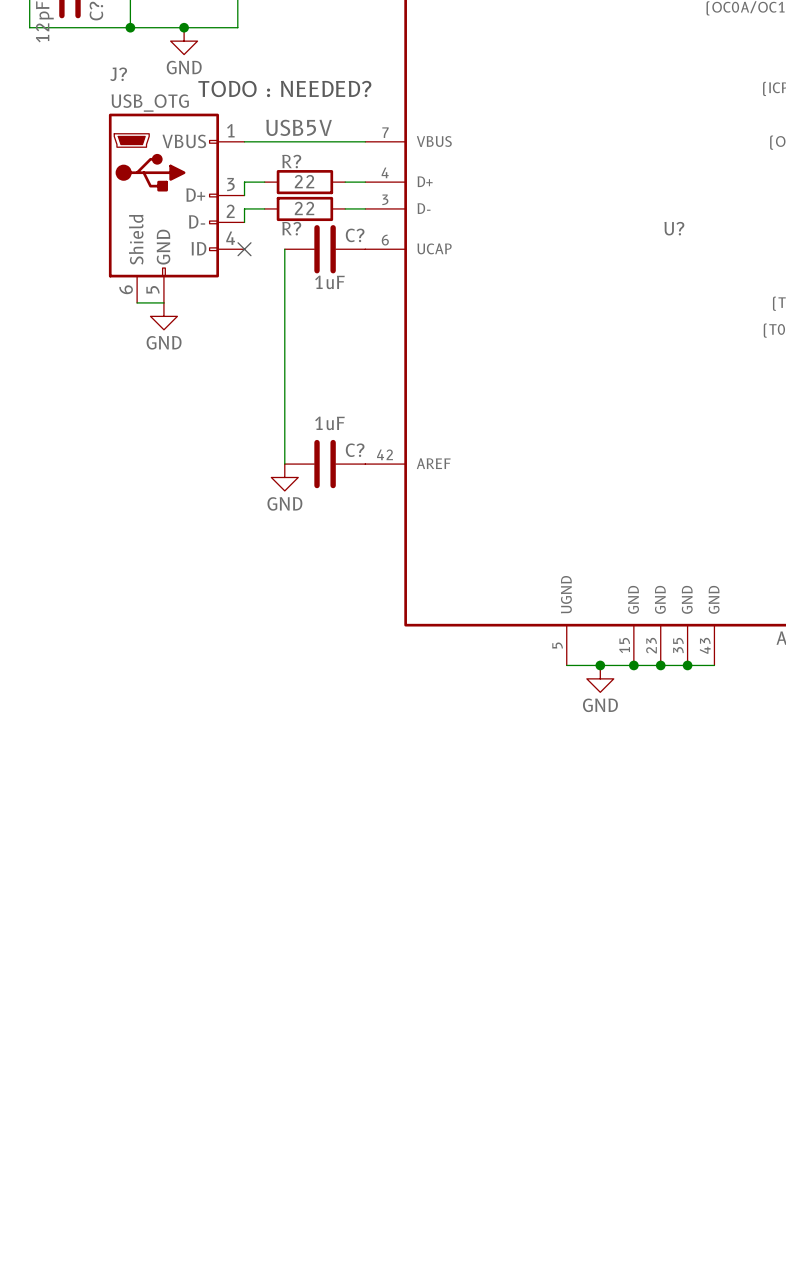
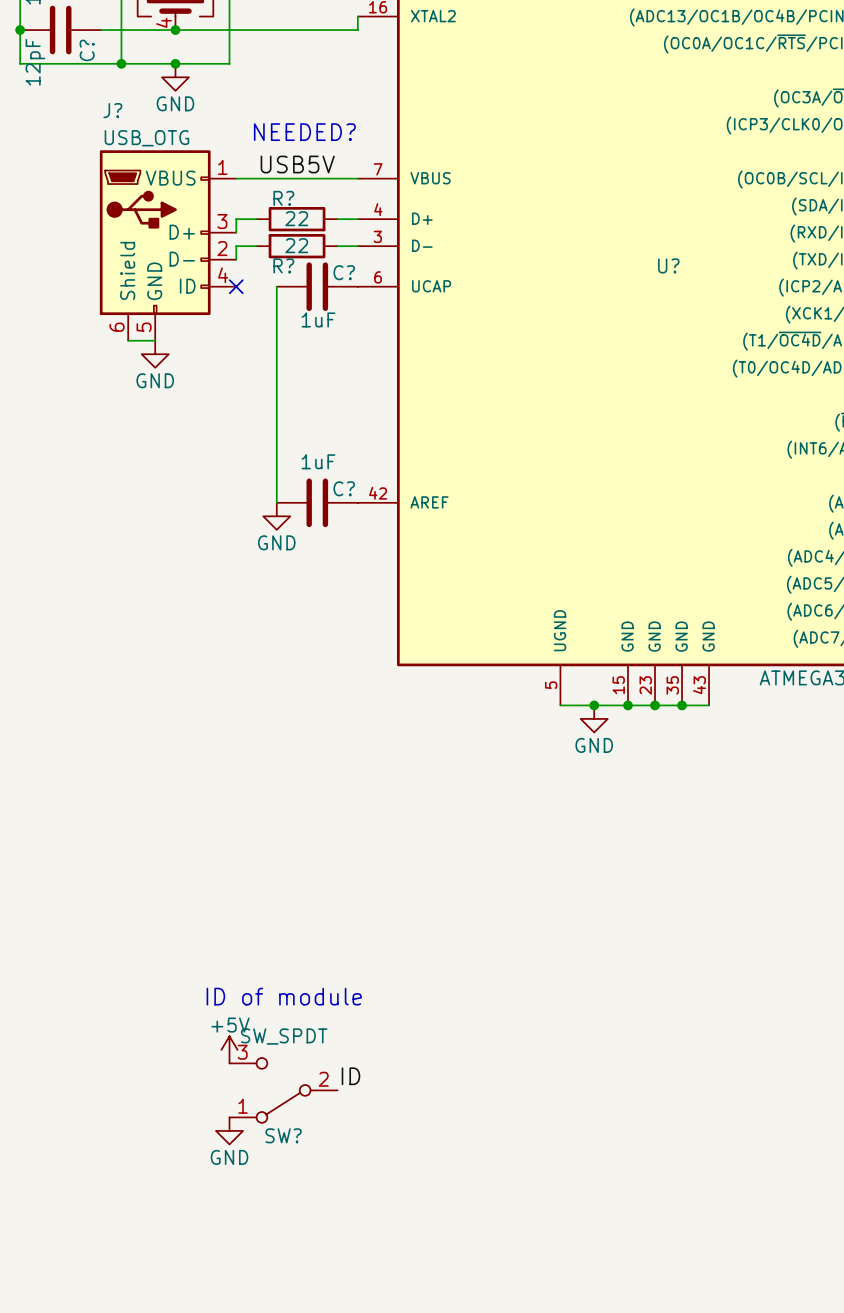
text: TODO : NEEDED? (284, 88) -> NEEDED? (304, 132)
text: none -> ID of module (284, 996)
power symbol: none -> +5V (229, 1049)
label: none -> ID (350, 1076)
SW?: none -> SW_SPDT (283, 1090)
power symbol: none -> GND (229, 1130)

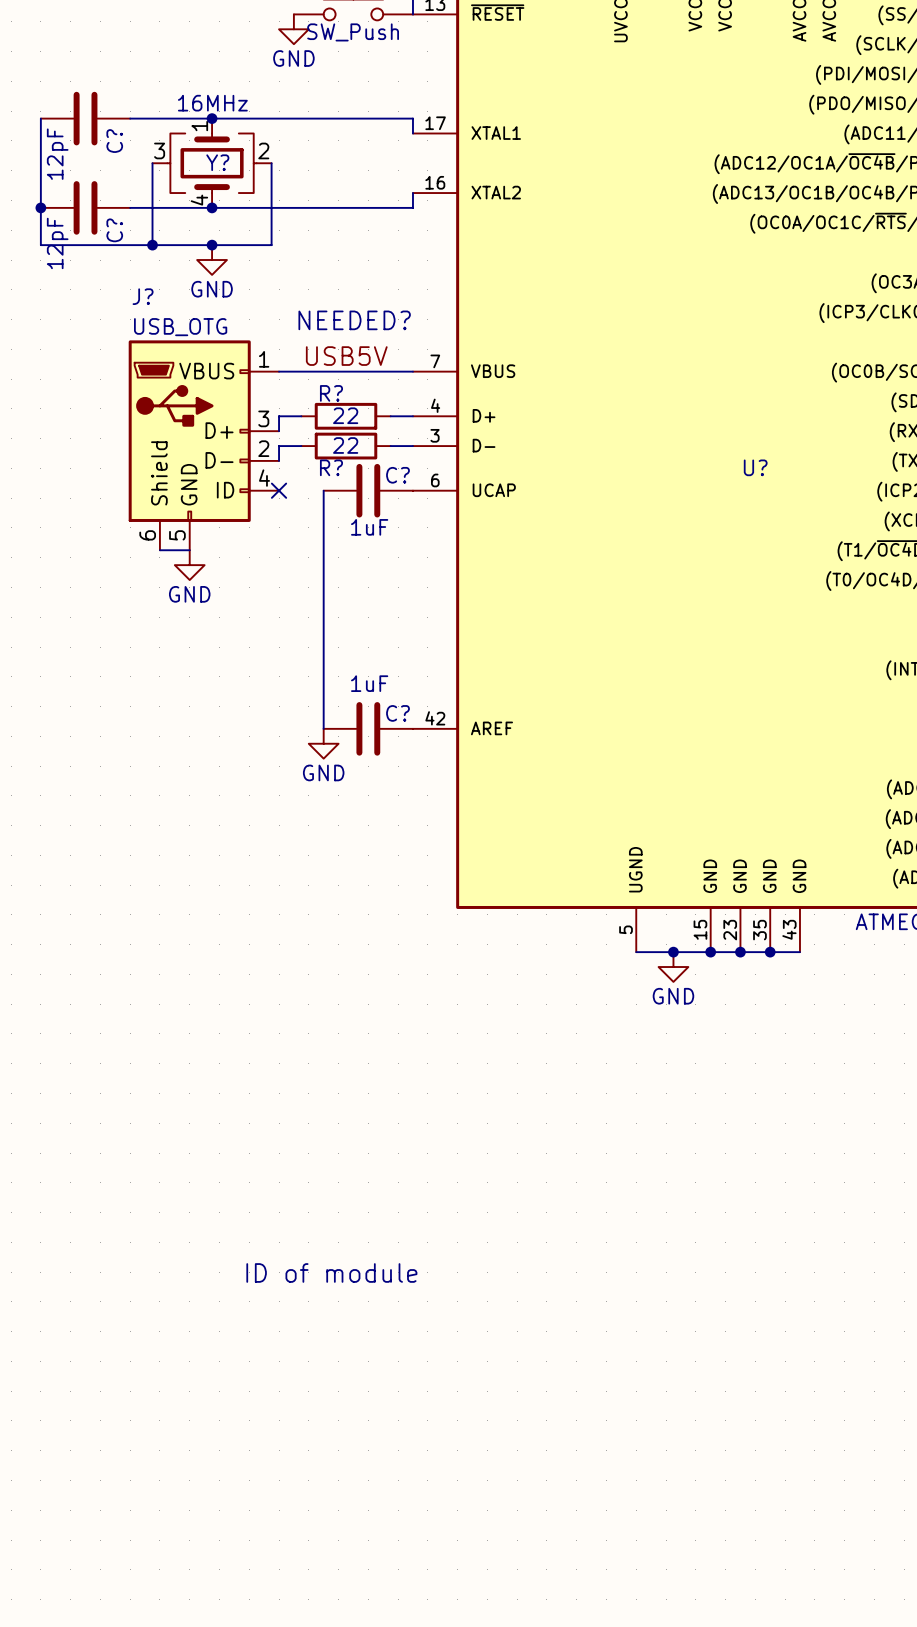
power symbol: +5V (229, 1049) -> none
label: ID (350, 1076) -> none
SW?: SW_SPDT (283, 1090) -> none
power symbol: GND (229, 1130) -> none

